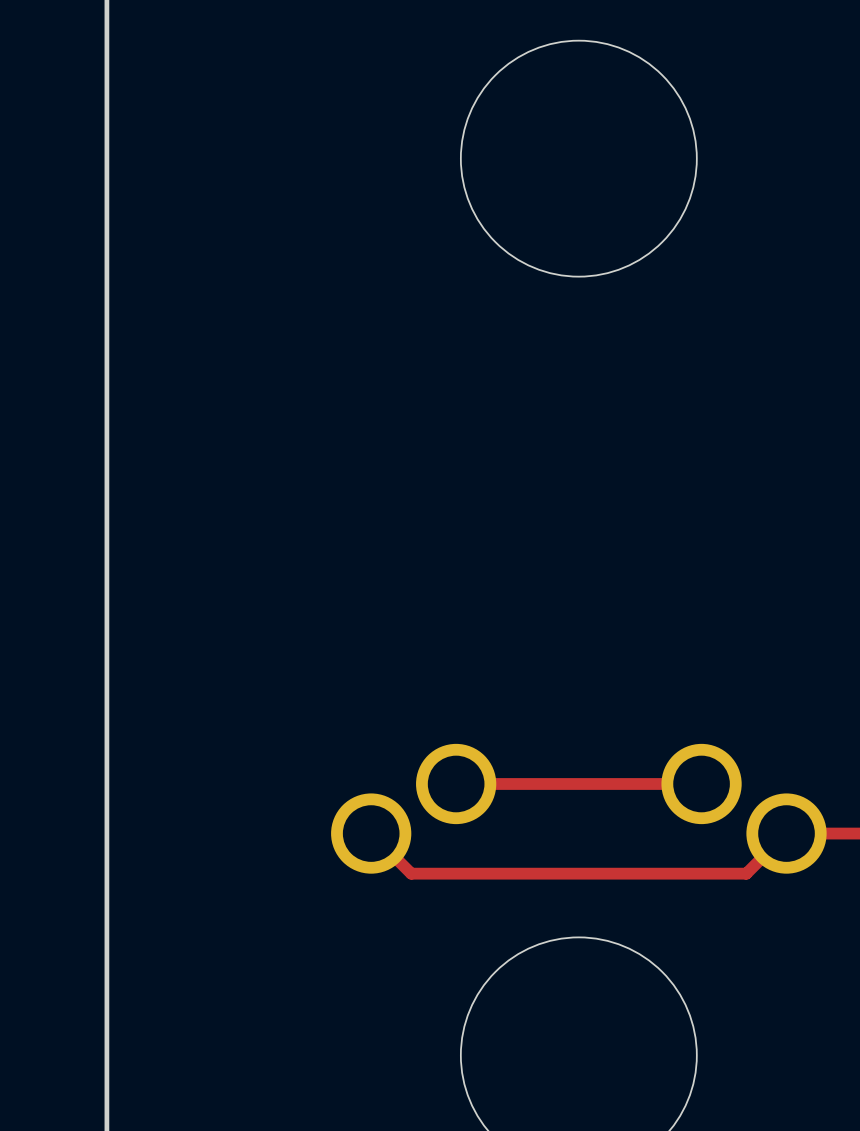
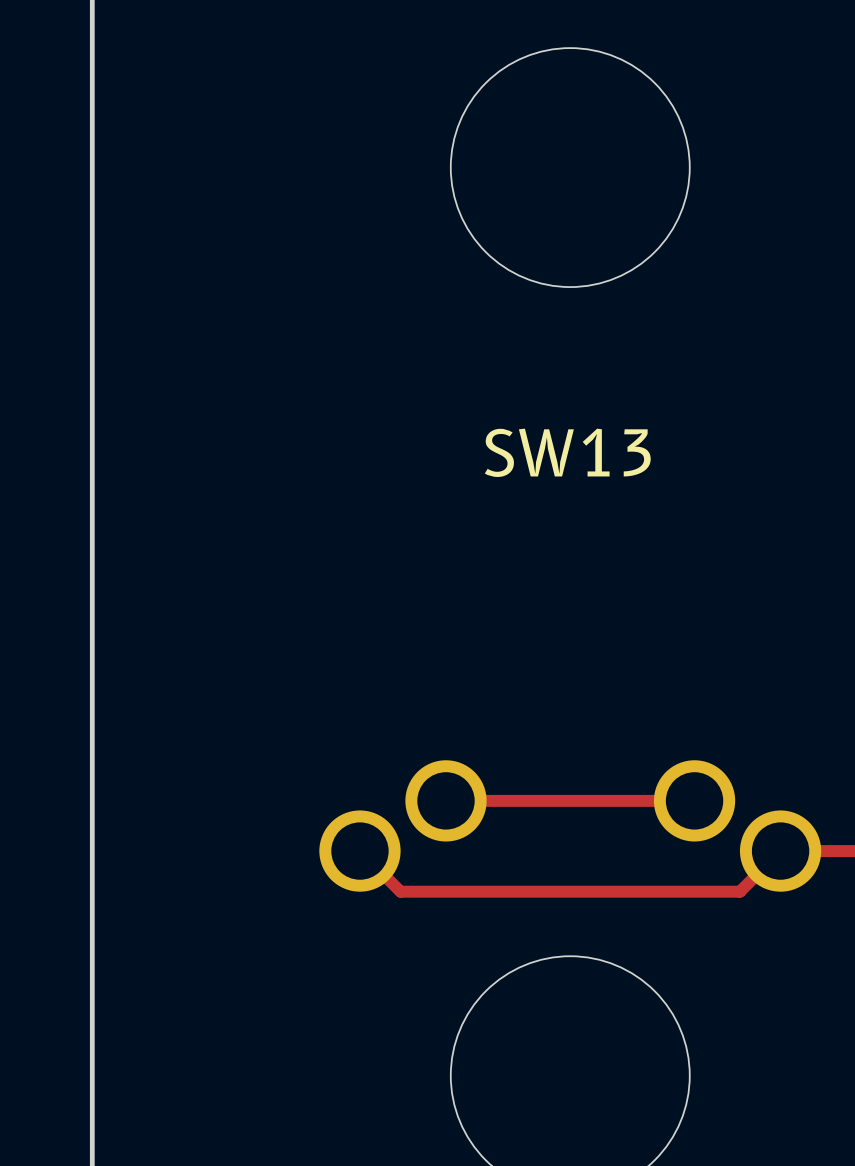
SW13 name: none -> SW13 (567, 452)

